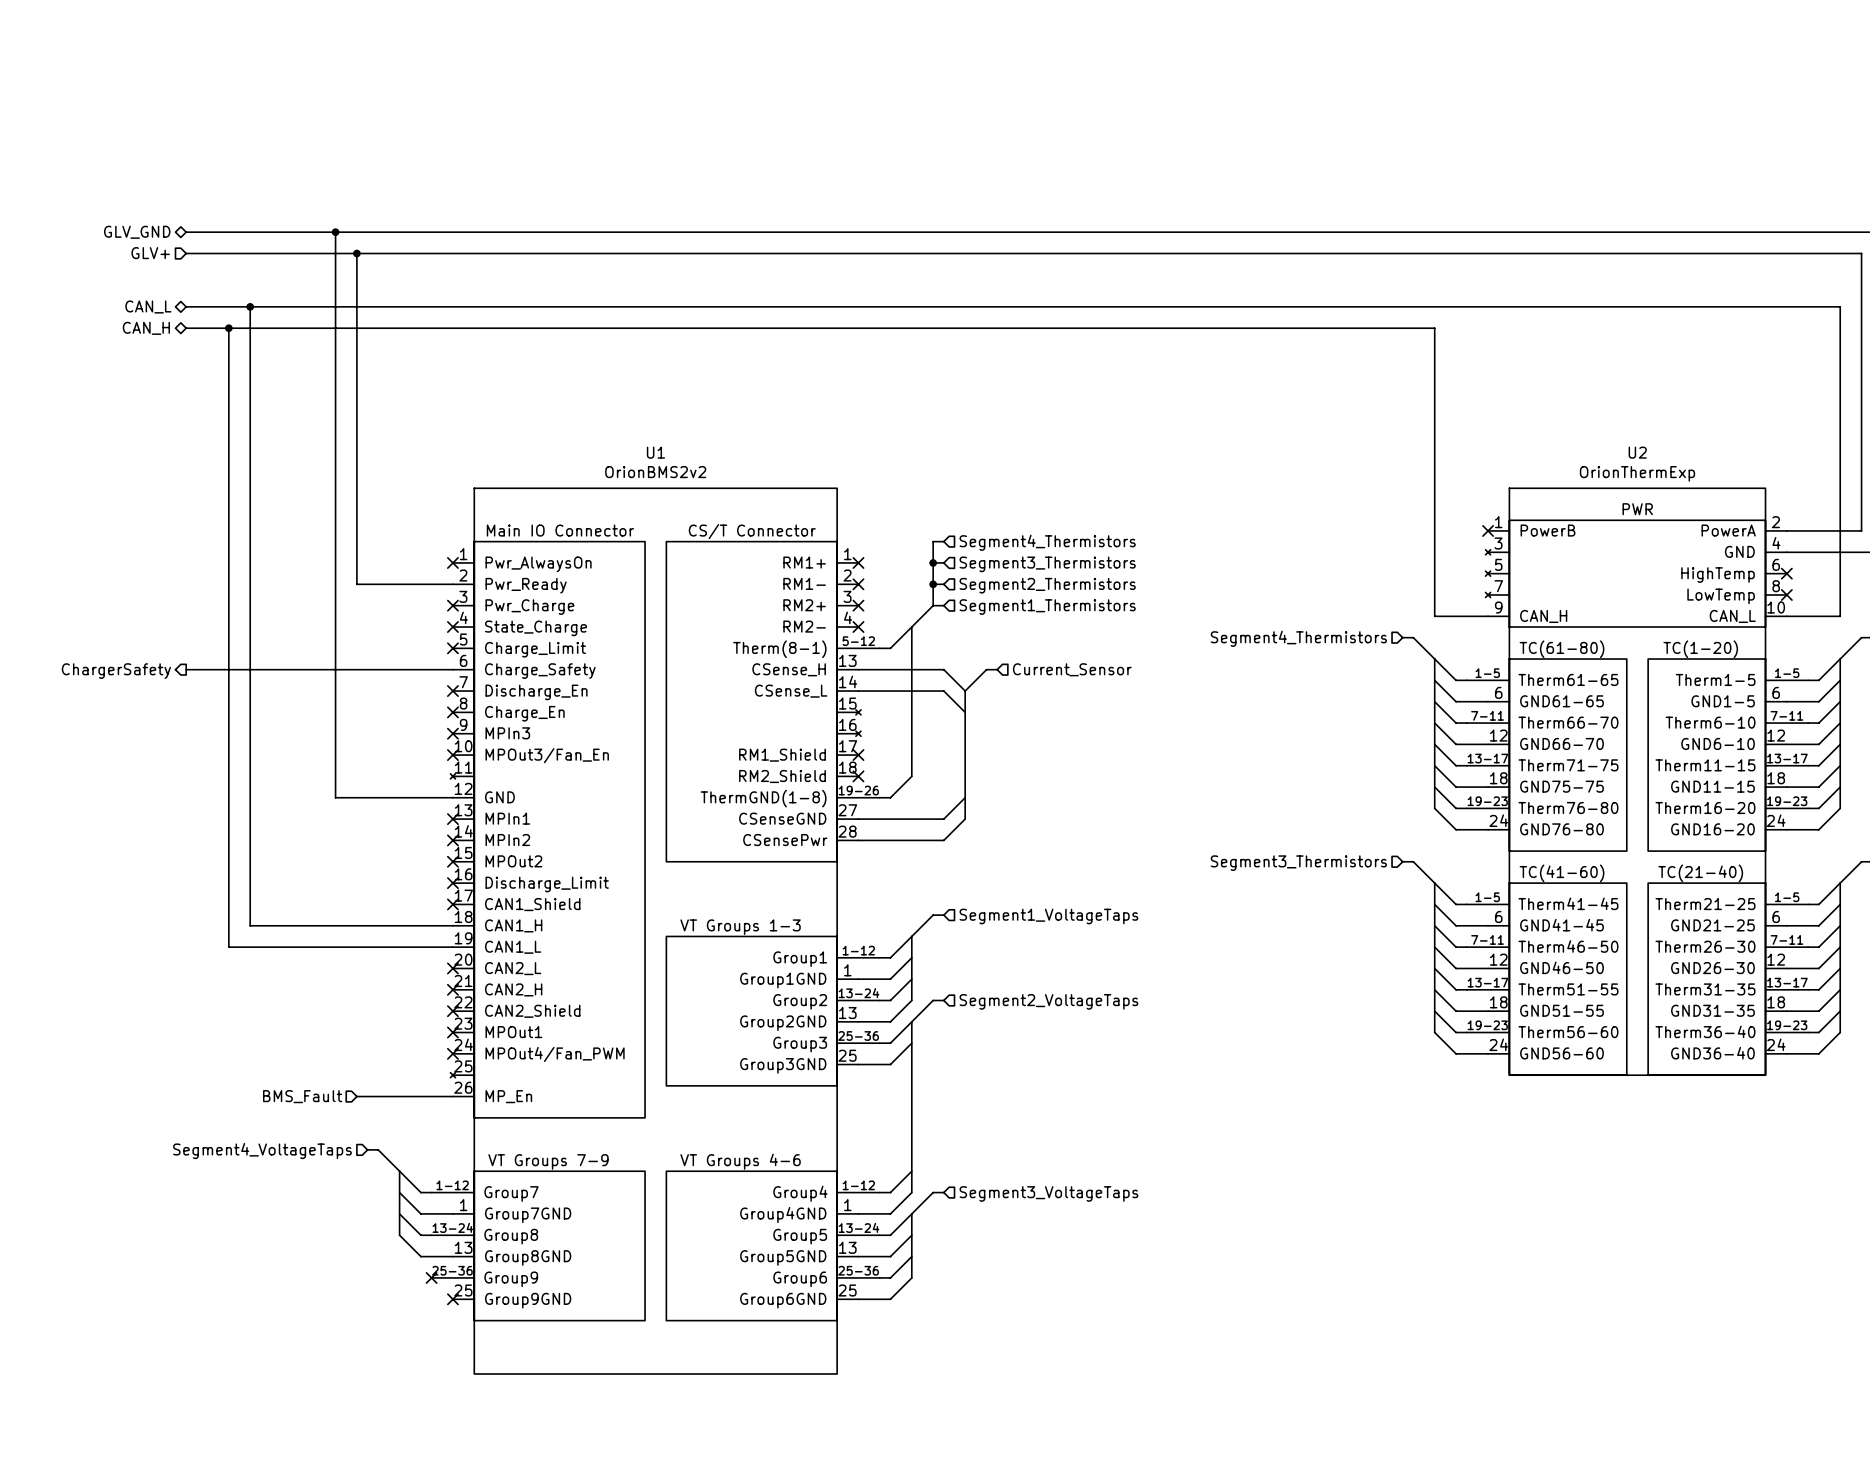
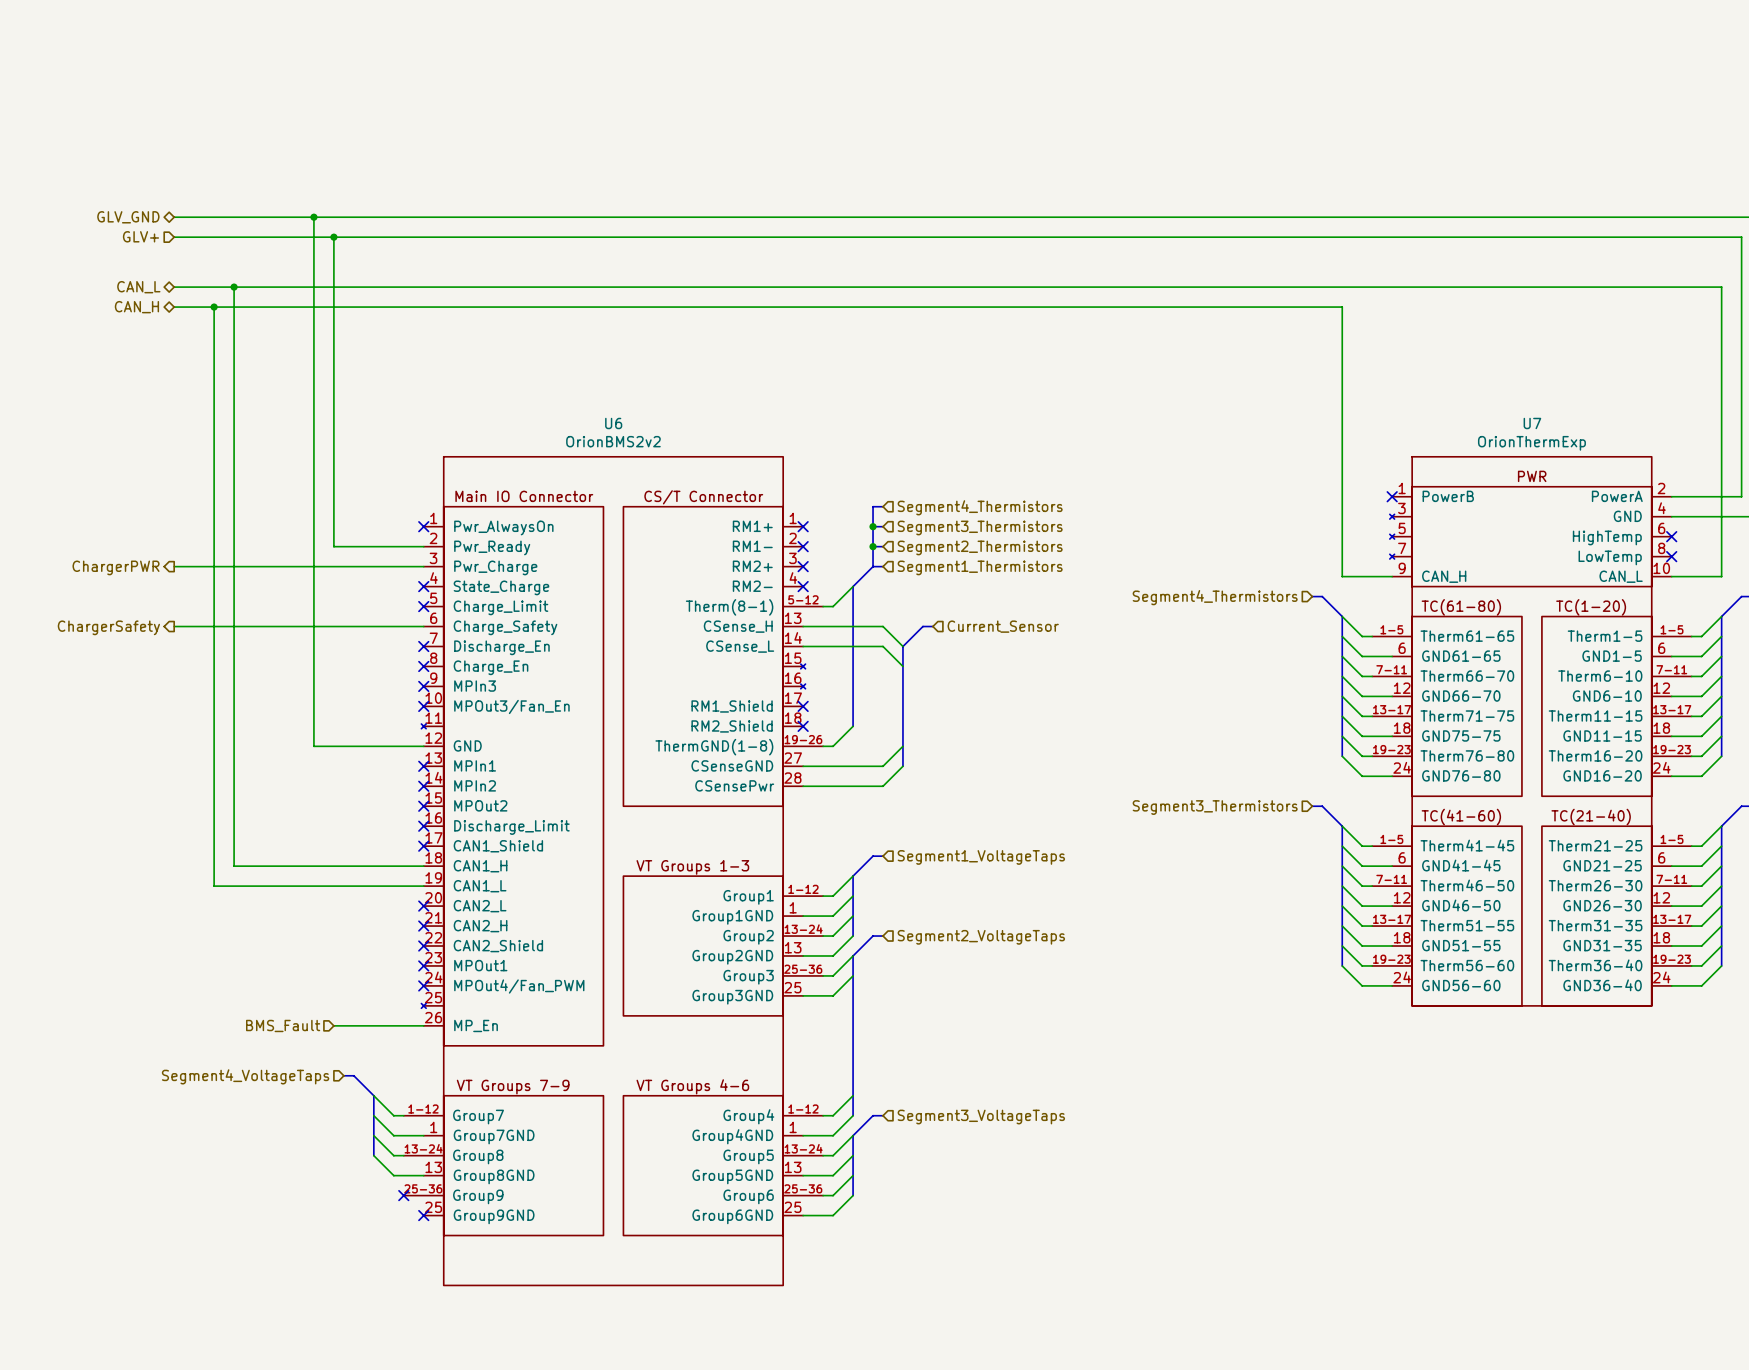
U1 name: U1 (655, 452) -> U6 (613, 423)
U2 name: U2 (1637, 452) -> U7 (1532, 423)
wire: none -> (174, 566) (423, 566)
no-connect mark: (452, 605) -> none
hierarchical label: none -> ChargerPWR (116, 567)

